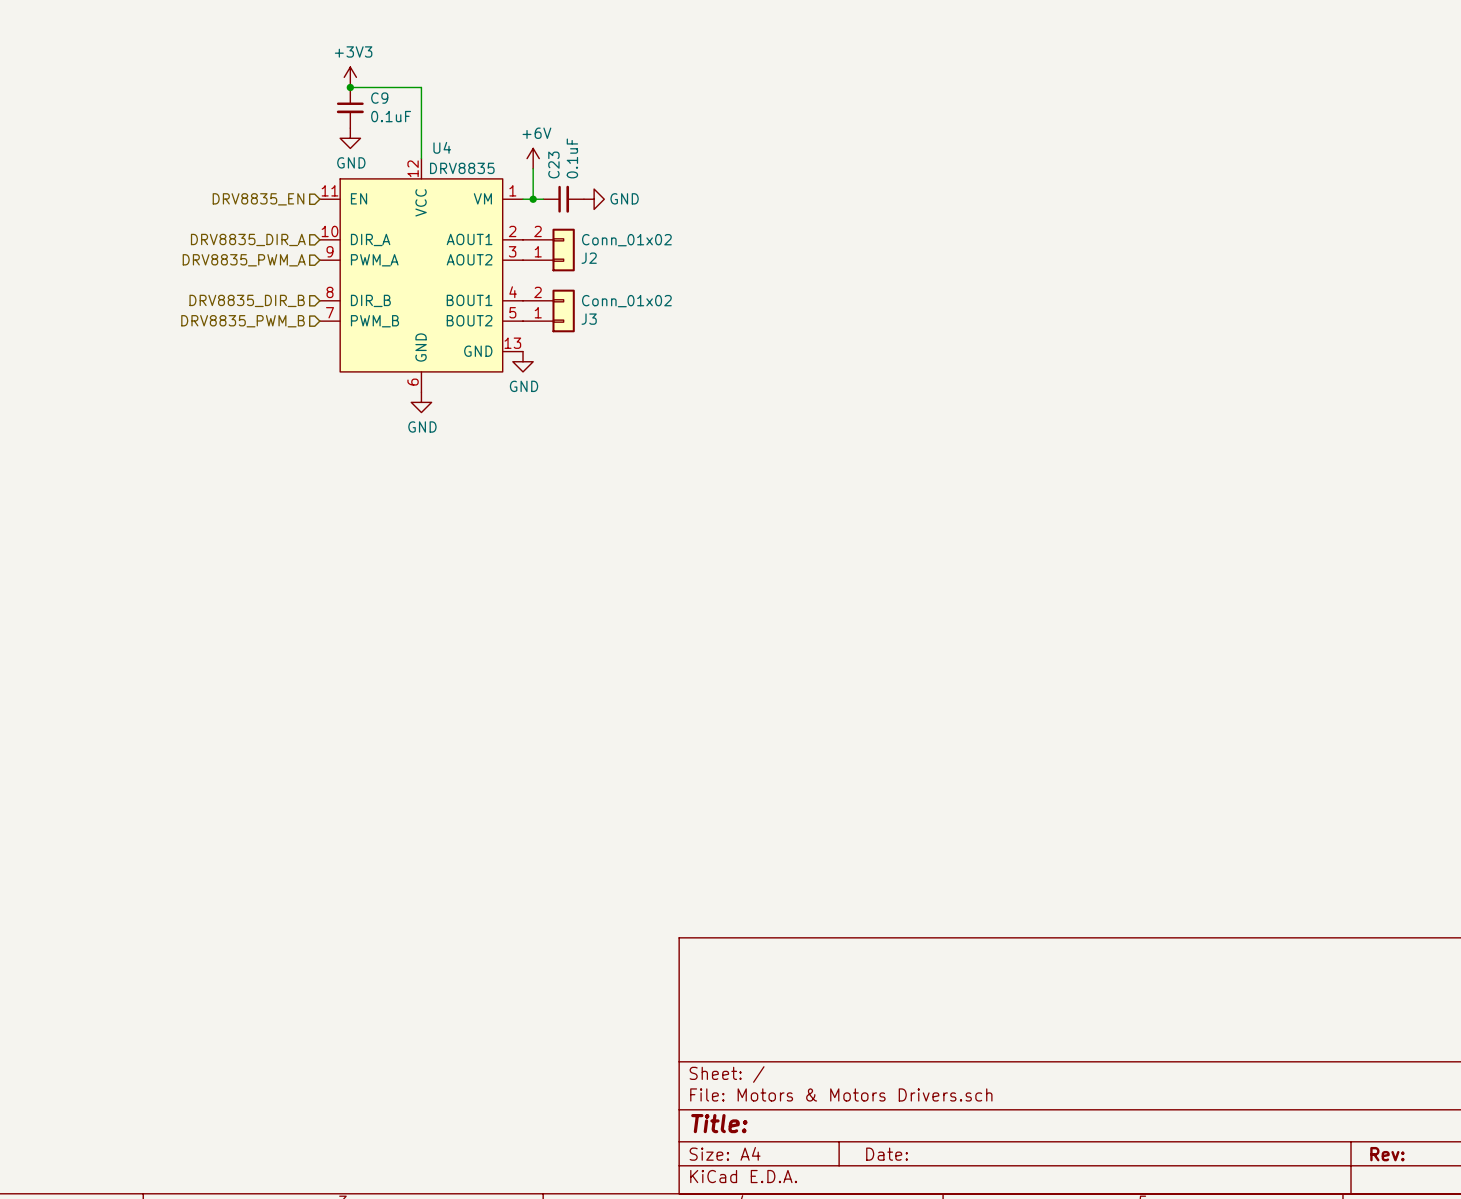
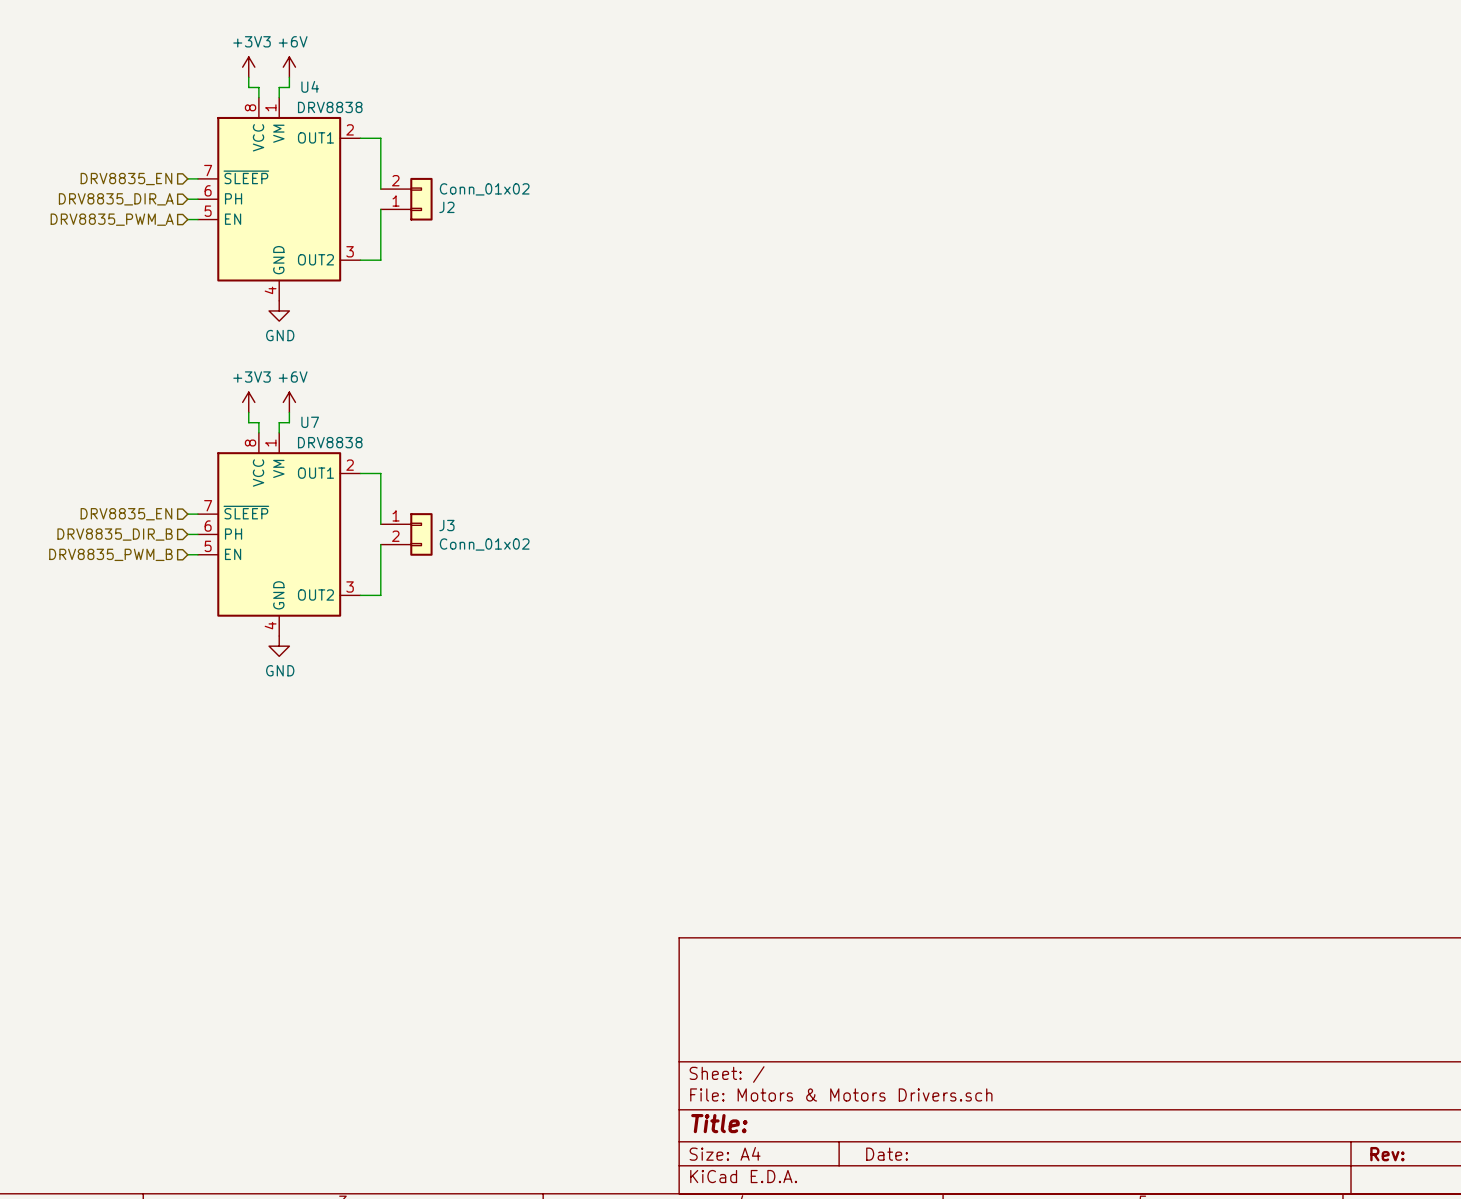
power symbol: none -> +6V (289, 67)
wire: none -> (248, 77) (248, 87) (258, 87) (258, 97)
wire: none -> (289, 77) (289, 87) (279, 87) (279, 97)
power symbol position: +3V3 (350, 77) -> +3V3 (248, 67)
wire: (350, 87) (421, 87) (421, 158) -> none
junction: (350, 87) -> none
C9: 0.1uF (350, 107) -> none
power symbol: GND (350, 138) -> none
wire: none -> (360, 138) (380, 138) (380, 189)
U4 name position: U4 (442, 147) -> U4 (310, 86)
U4 symbol: [319, 158, 524, 393] -> [197, 97, 361, 301]
power symbol: +6V (533, 158) -> none
U4 value: DRV8835 (462, 168) -> DRV8838 (330, 107)
wire: (533, 168) (533, 199) -> none
wire: none -> (187, 178) (197, 178)
wire: none -> (187, 199) (197, 199)
hierarchical label position: DRV8835_EN (258, 199) -> DRV8835_EN (126, 179)
wire: (523, 199) (543, 199) -> none
junction: (533, 199) -> none
C23: 0.1uF (563, 199) -> none
power symbol: GND (594, 199) -> none
wire: none -> (187, 219) (197, 219)
hierarchical label position: DRV8835_DIR_A (248, 239) -> DRV8835_DIR_A (116, 199)
J2 position: (548, 250) -> (406, 199)
hierarchical label position: DRV8835_PWM_A (244, 260) -> DRV8835_PWM_A (112, 219)
hierarchical label: DRV8835_DIR_B (247, 300) -> none
power symbol: none -> GND (279, 310)
J3 position: (548, 310) -> (406, 534)
J3 flip: as is (563, 310) -> up-down (421, 534)
hierarchical label: DRV8835_PWM_B (243, 321) -> none
power symbol: GND (523, 361) -> none
power symbol: none -> +3V3 (248, 402)
power symbol: none -> +6V (289, 402)
power symbol: GND (421, 402) -> none
wire: none -> (248, 412) (248, 422) (258, 422) (258, 432)
wire: none -> (289, 412) (289, 422) (279, 422) (279, 432)
wire: none -> (360, 473) (380, 473) (380, 524)
hierarchical label: none -> DRV8835_EN (126, 514)
wire: none -> (187, 514) (197, 514)
hierarchical label: none -> DRV8835_DIR_B (115, 534)
wire: none -> (187, 534) (197, 534)
U7: none -> DRV8838 (279, 534)
wire: none -> (380, 544) (380, 595) (360, 595)
hierarchical label: none -> DRV8835_PWM_B (110, 554)
wire: none -> (187, 554) (197, 554)
power symbol: none -> GND (279, 646)

